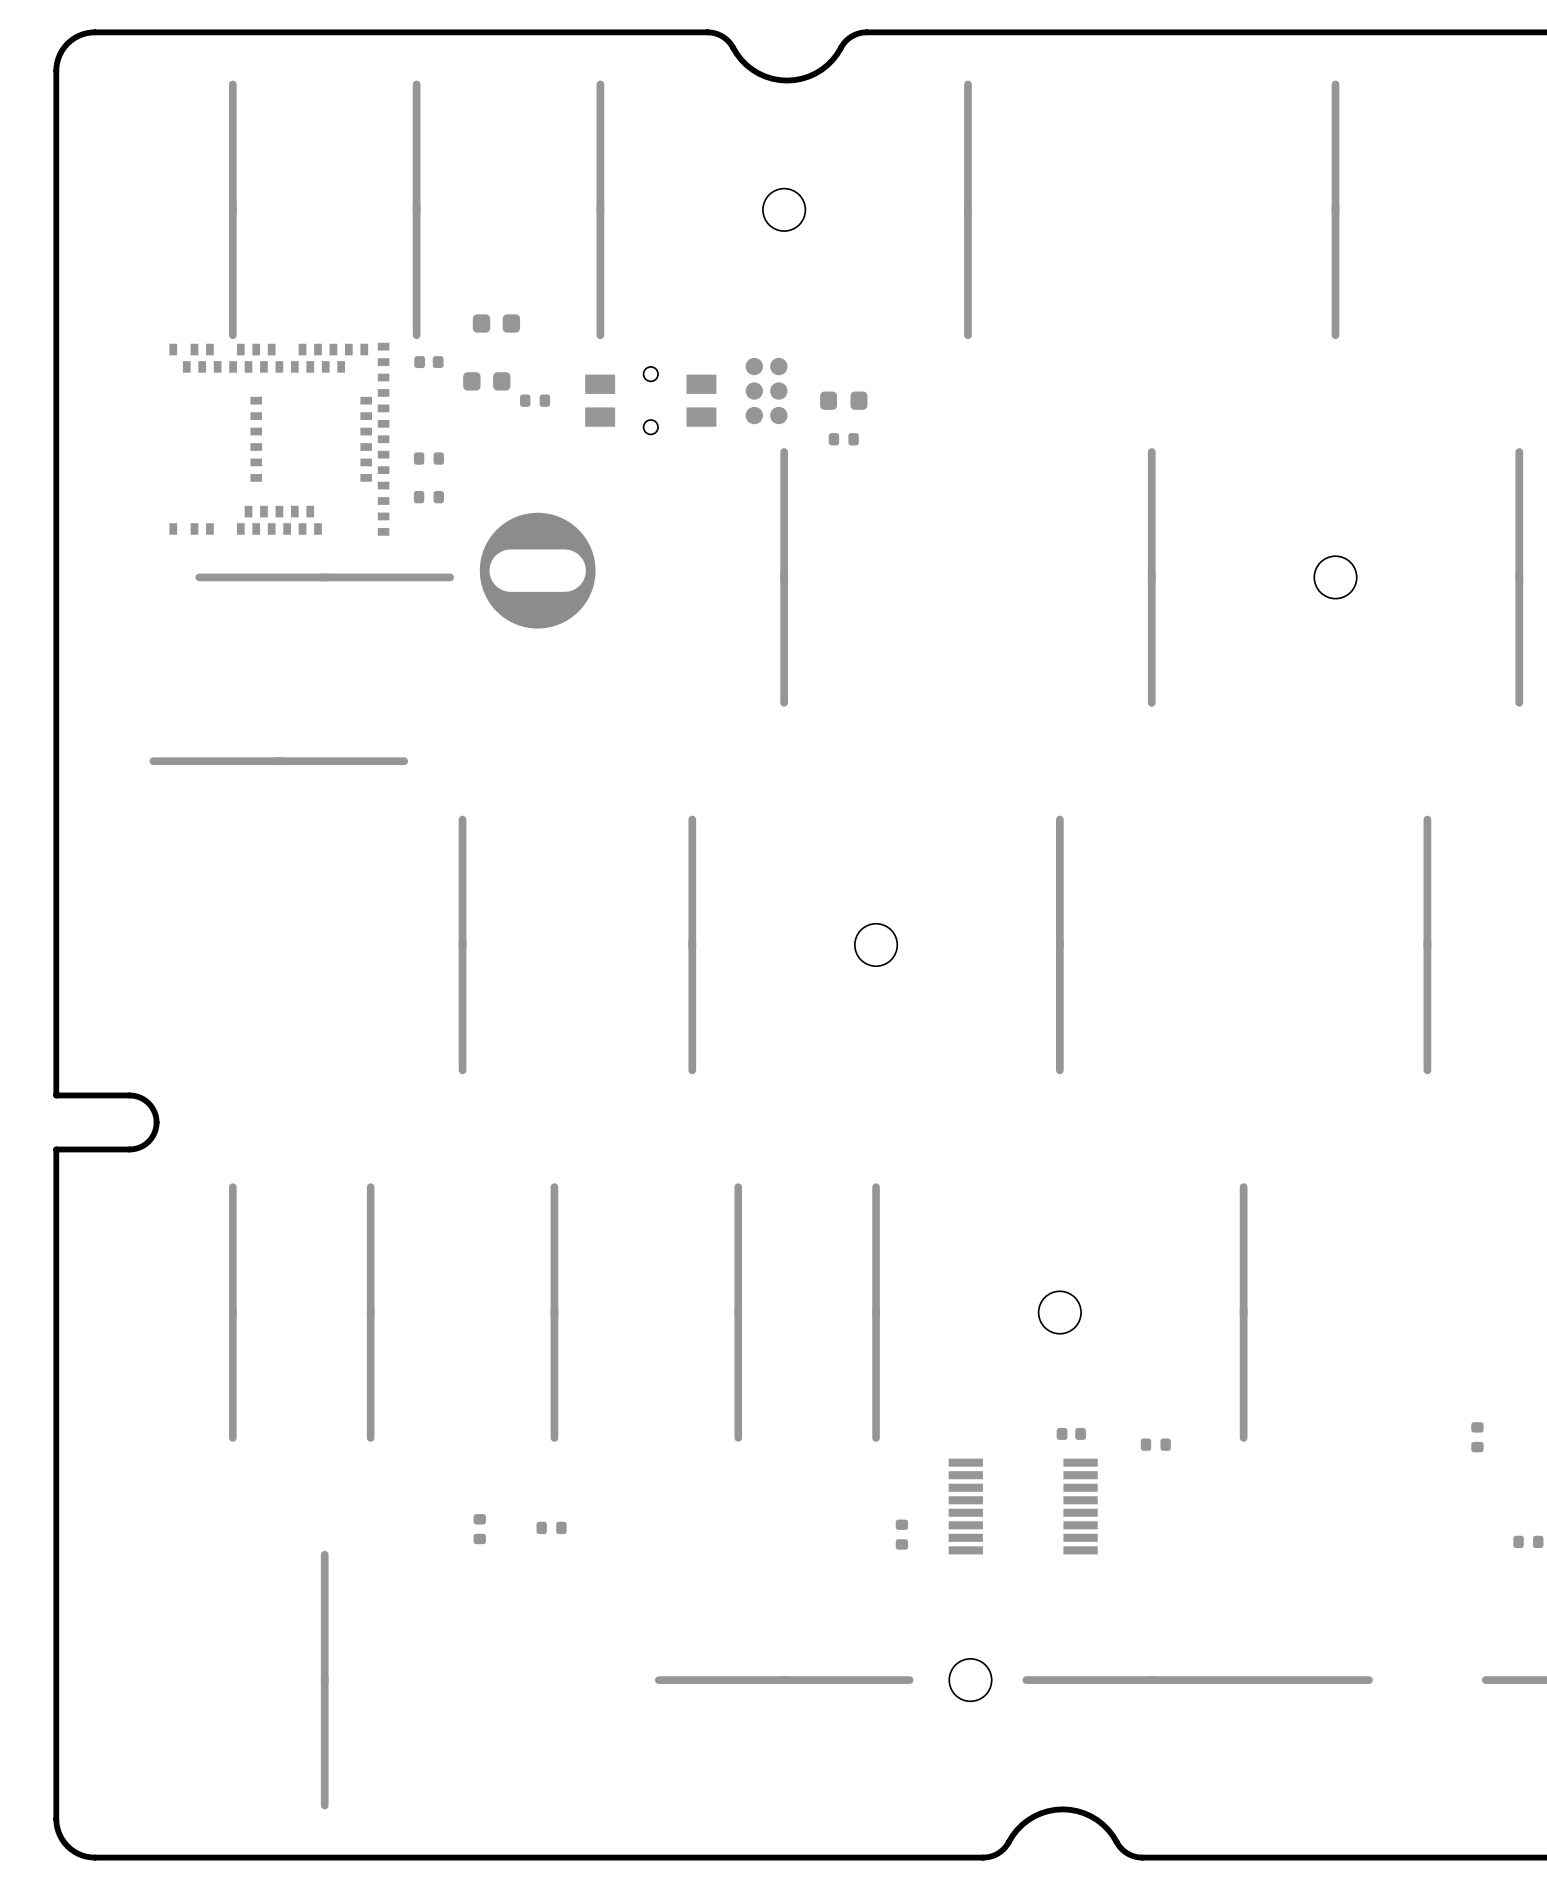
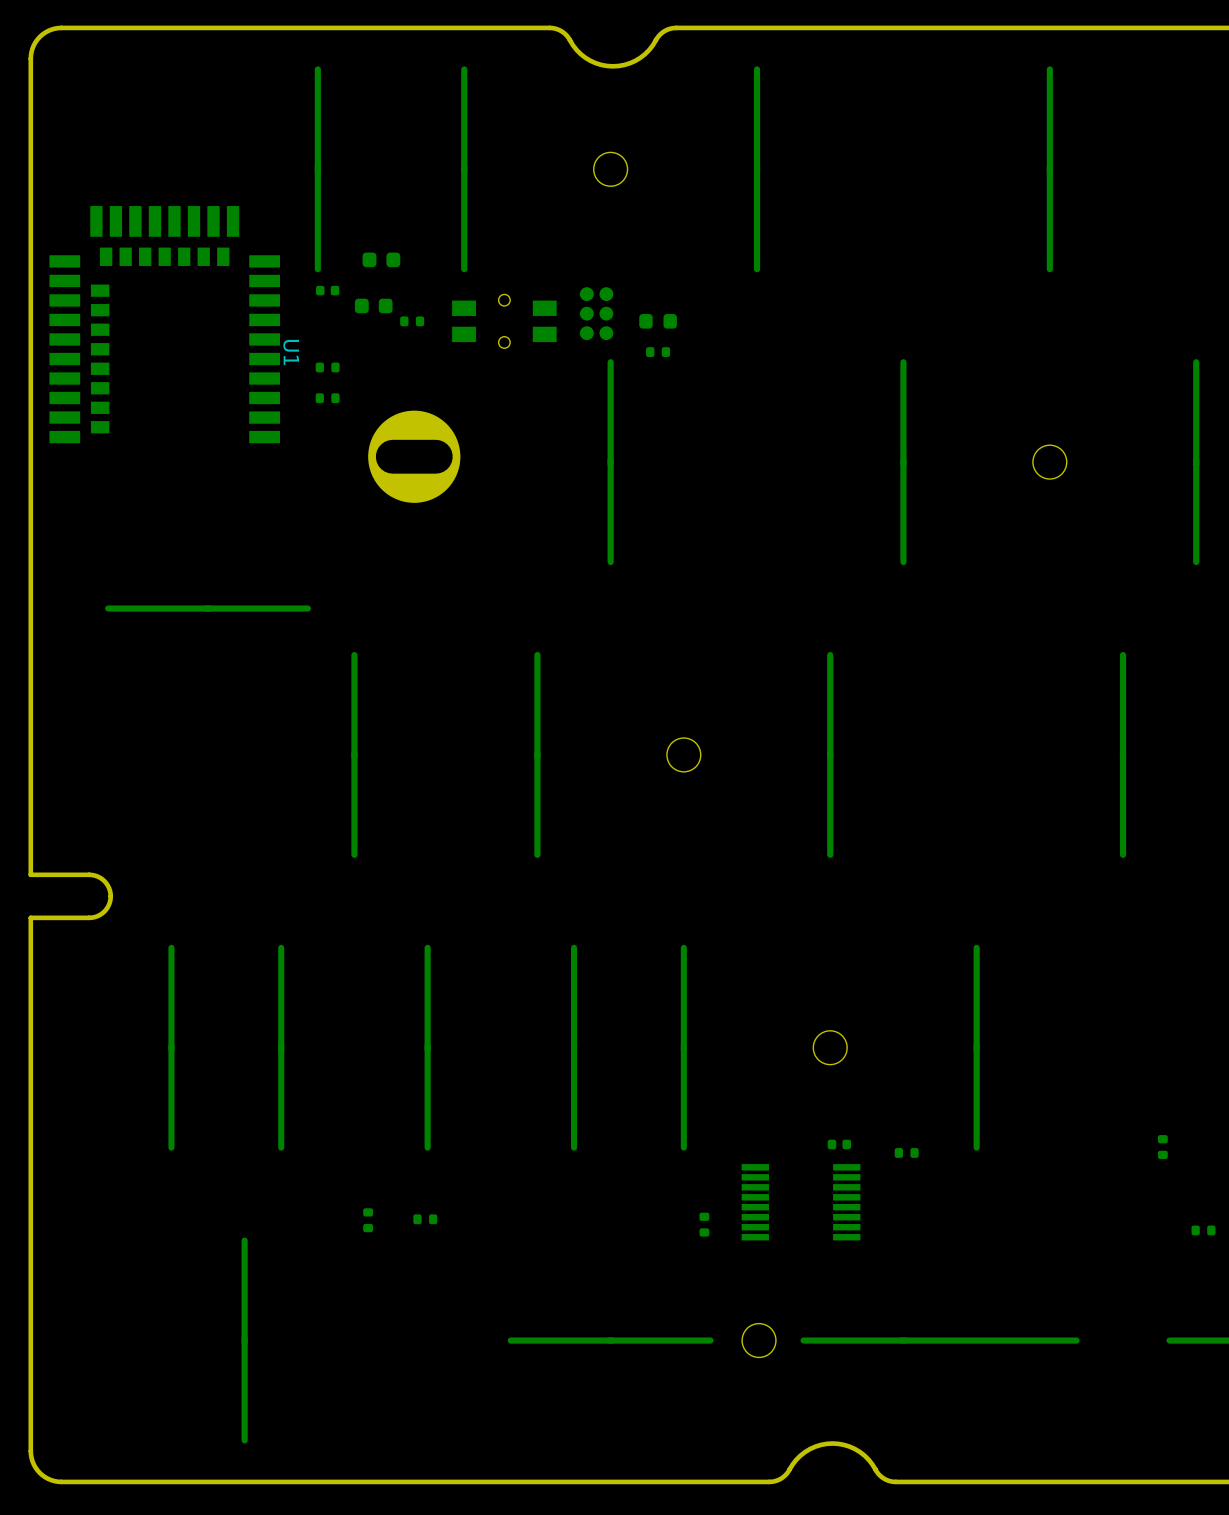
part: (232, 209) -> none
U1: none -> (164, 324)
part: (279, 439) -> none
part: (324, 577) -> none

